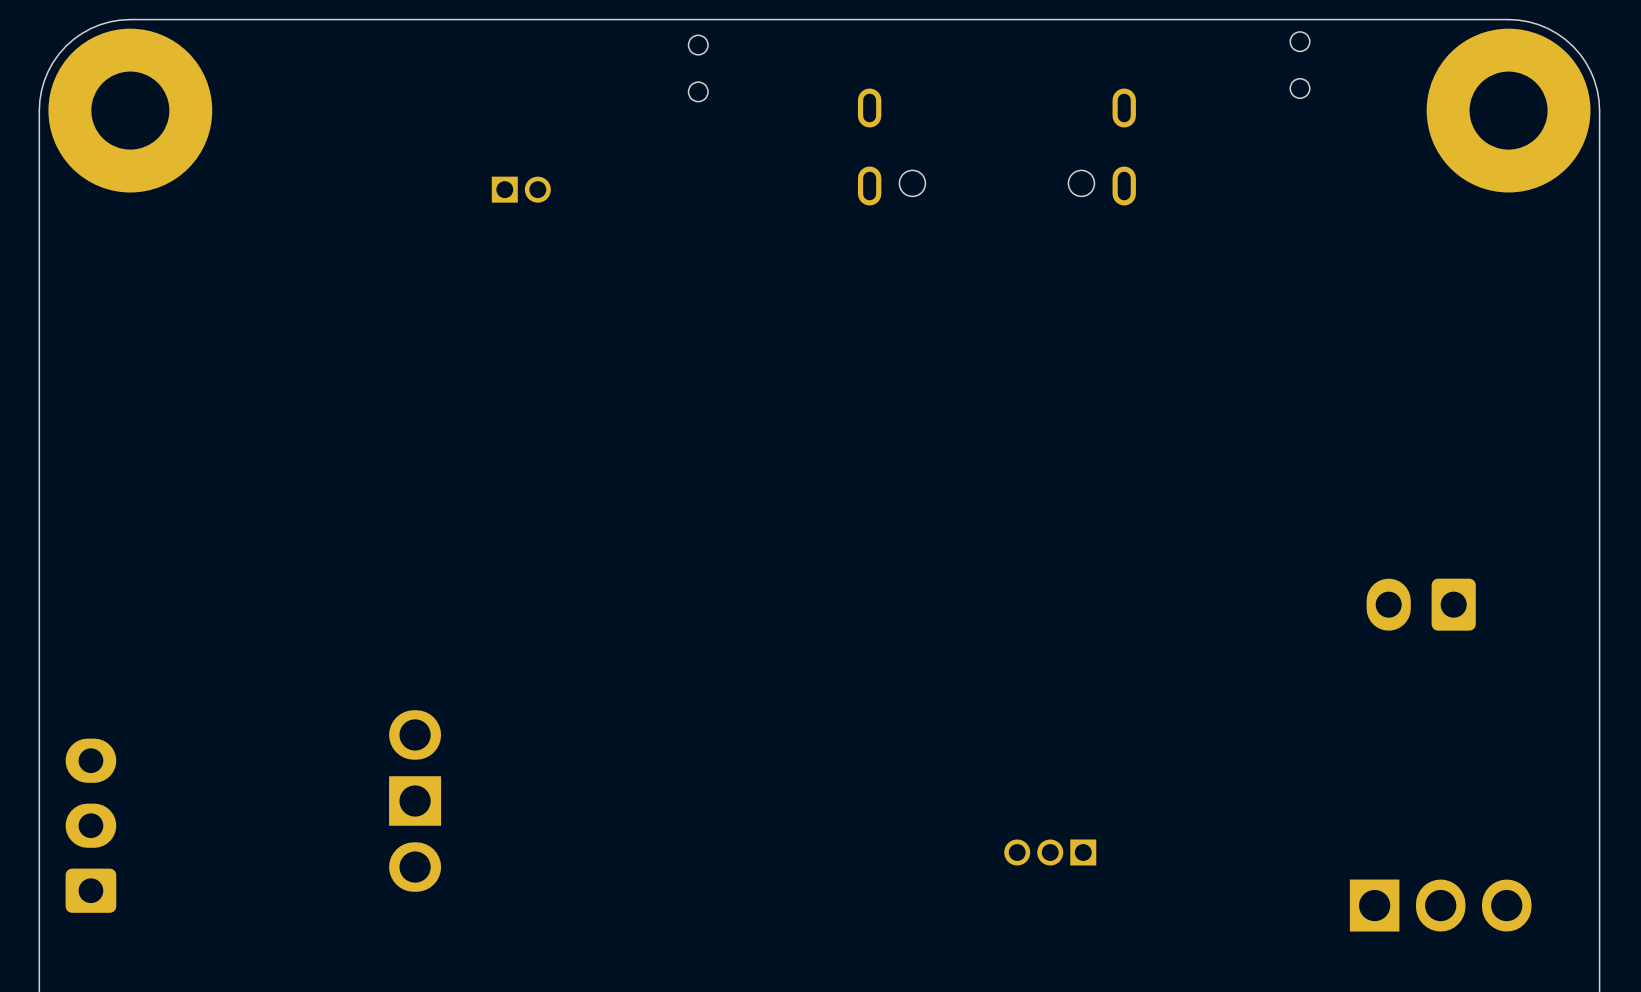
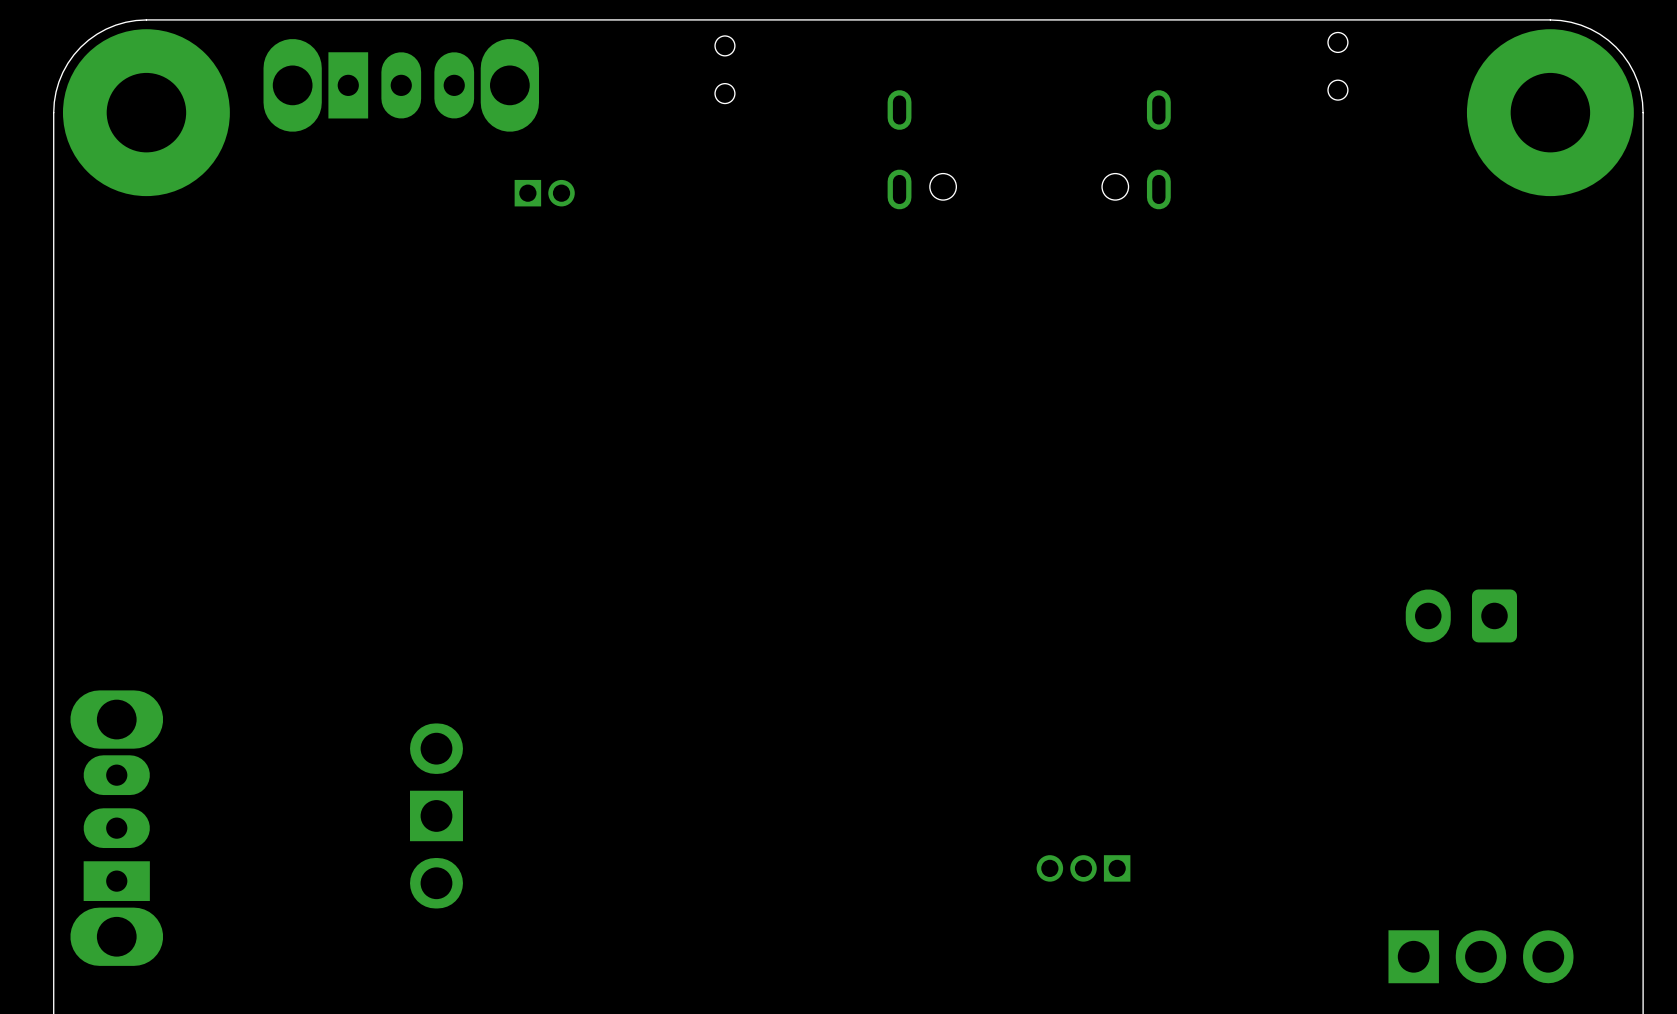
part: none -> (401, 85)
part footprint: [65, 738, 117, 913] -> [70, 690, 164, 966]
part position: (1440, 905) -> (1480, 956)

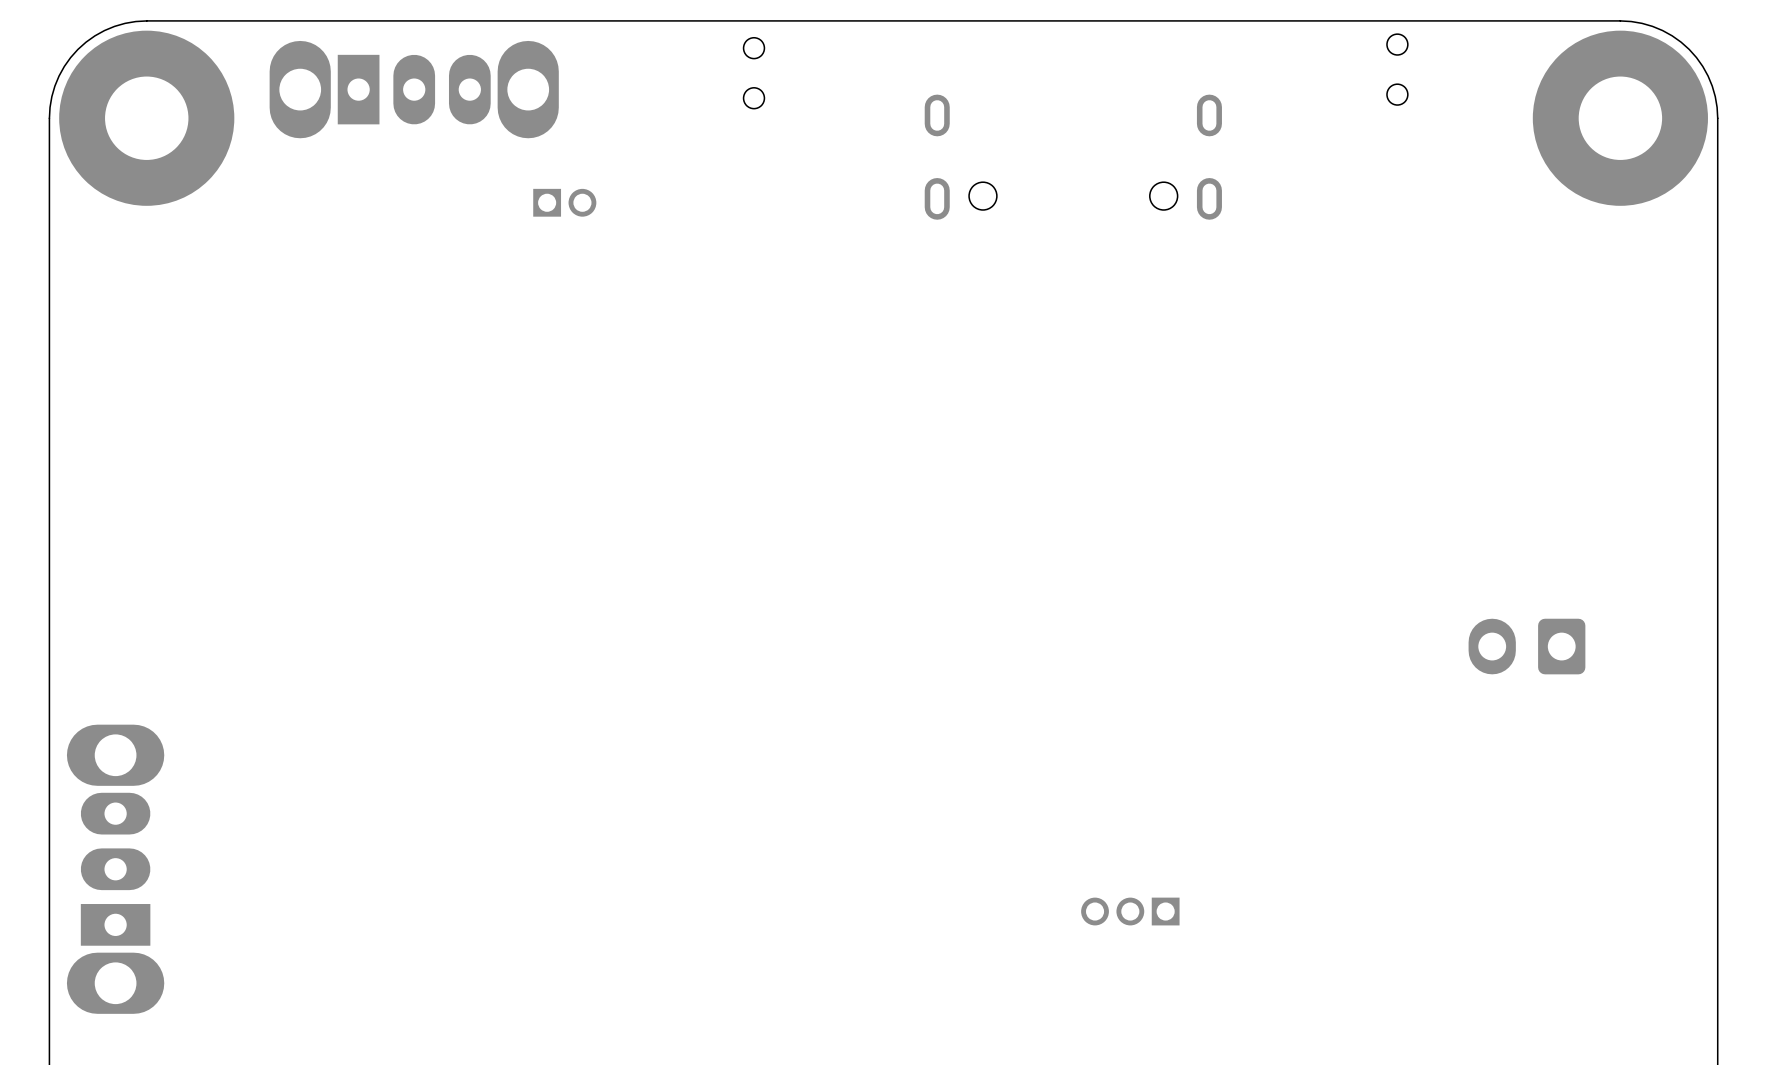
part: (436, 815) -> none
part: (1480, 956) -> none

